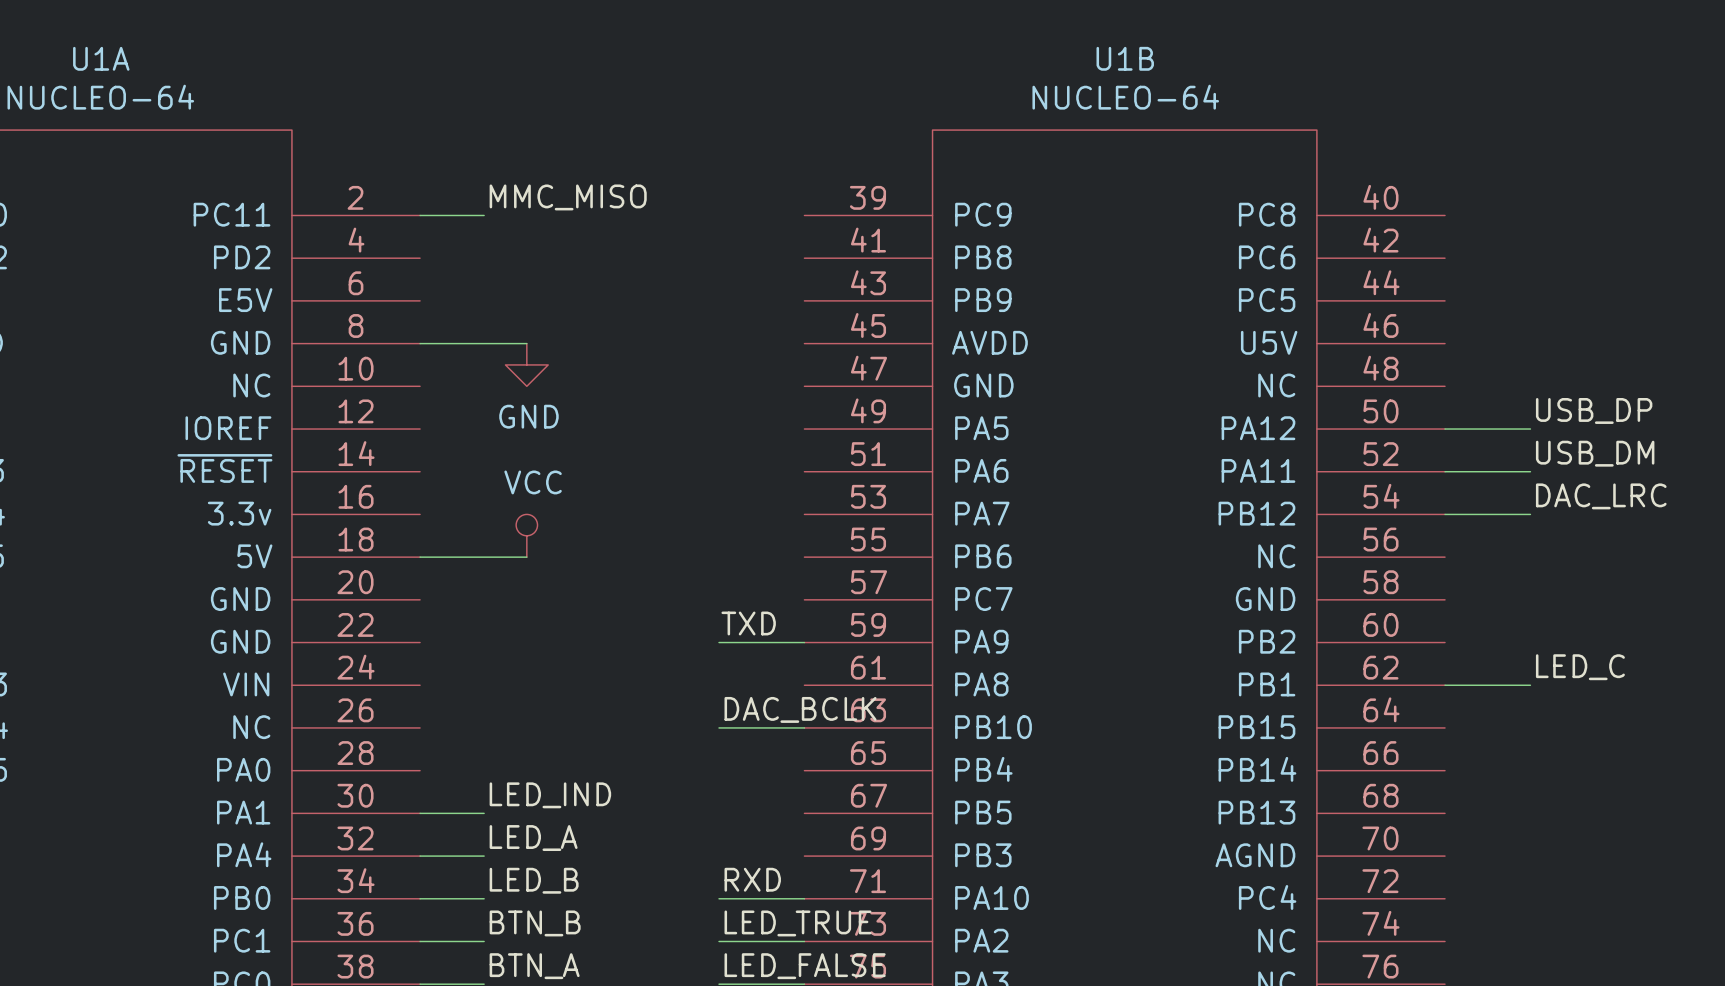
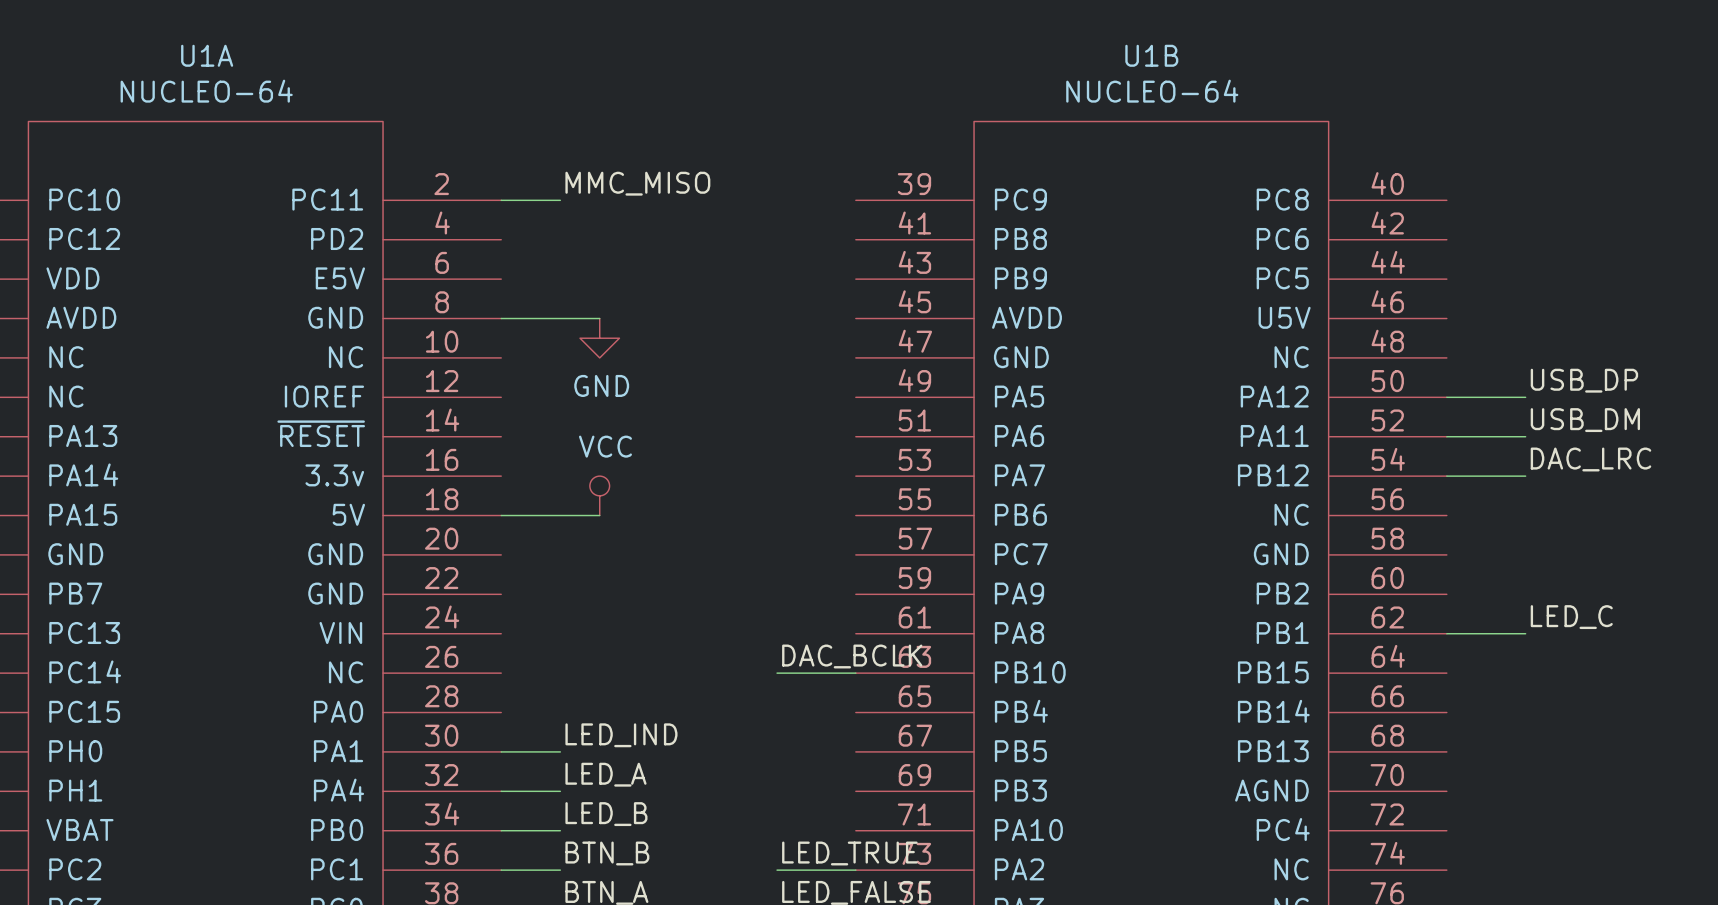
label: TXD (748, 623) -> none
wire: (719, 642) (804, 642) -> none
label: RXD (752, 879) -> none
wire: (719, 898) (804, 898) -> none

